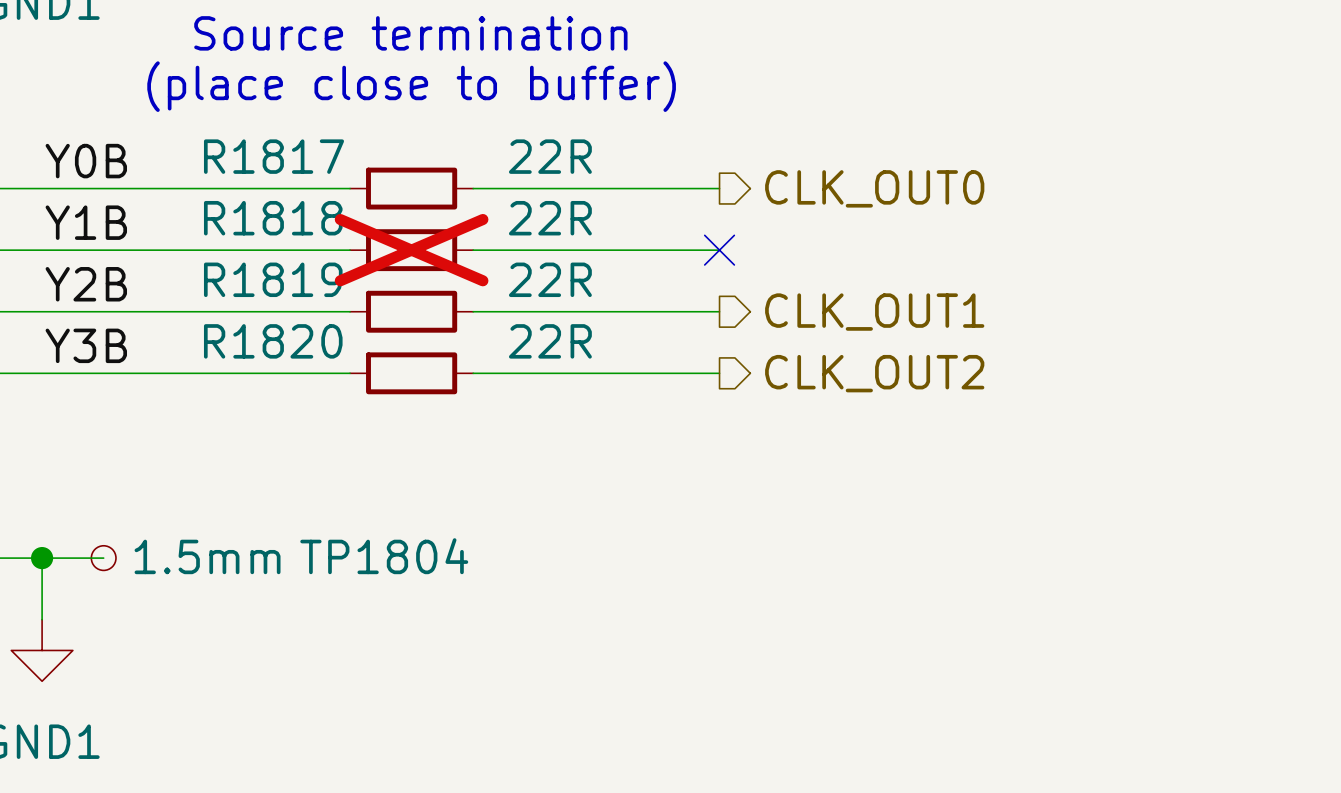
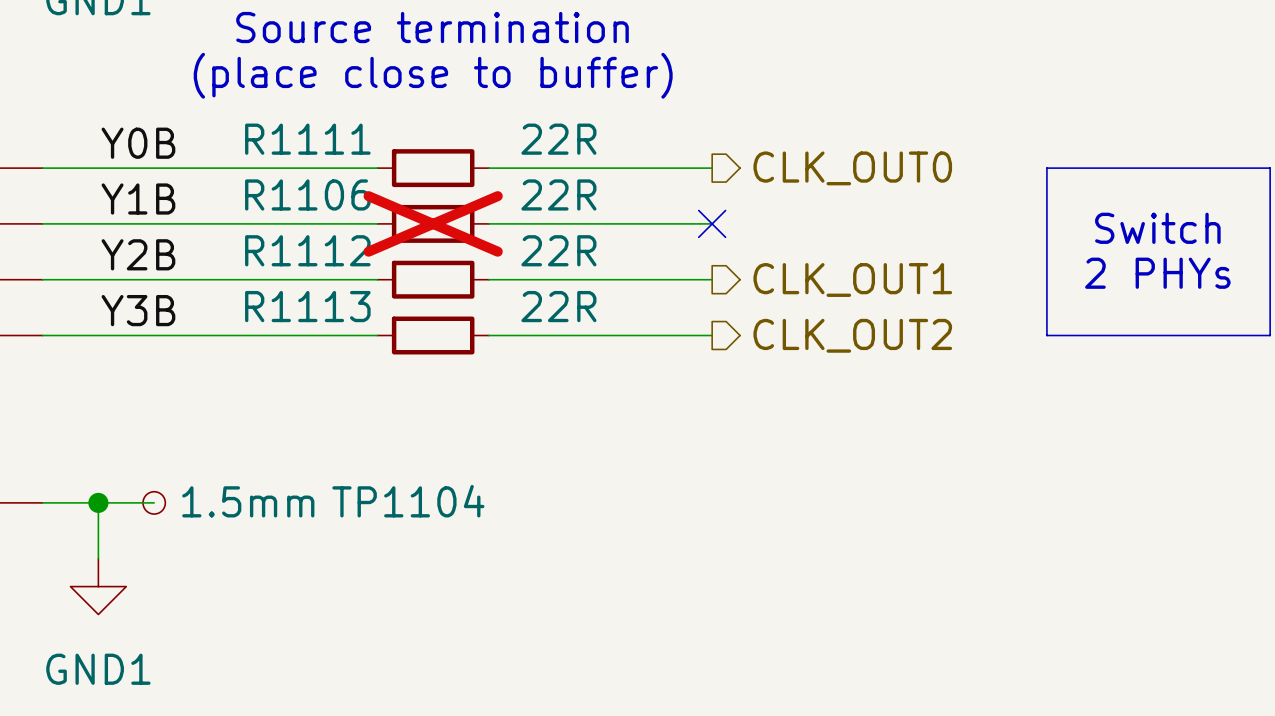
R1817 name: R1817 (274, 156) -> R1111 (307, 139)
line: none -> (1046, 168) (1270, 168) (1270, 335) (1046, 335) (1046, 168)
R1818 name: R1818 (273, 218) -> R1106 (307, 194)
text: none -> Switch (1157, 228)
R1819 name: R1819 (273, 279) -> R1112 (307, 250)
text: none -> 2 PHYs (1157, 273)
R1820 name: R1820 (273, 341) -> R1113 (307, 306)
TP1804 name: TP1804 (384, 556) -> TP1104 (408, 501)

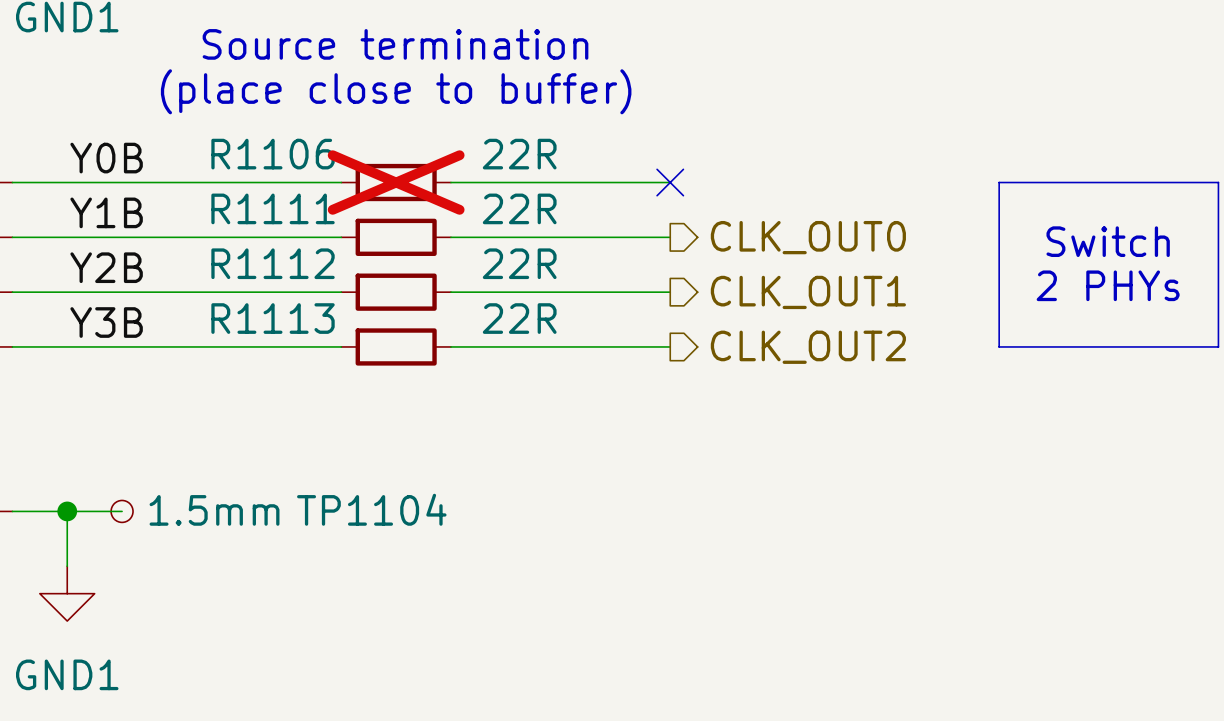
R1111 name: R1111 (307, 139) -> R1106 (273, 154)
R1111 do-not-place cross: none -> (396, 182)
hierarchical label position: CLK_OUT0 (852, 168) -> CLK_OUT0 (808, 237)
R1106 name: R1106 (307, 194) -> R1111 (273, 208)
R1106 do-not-place cross: (433, 223) -> none
no-connect mark position: (712, 223) -> (670, 182)

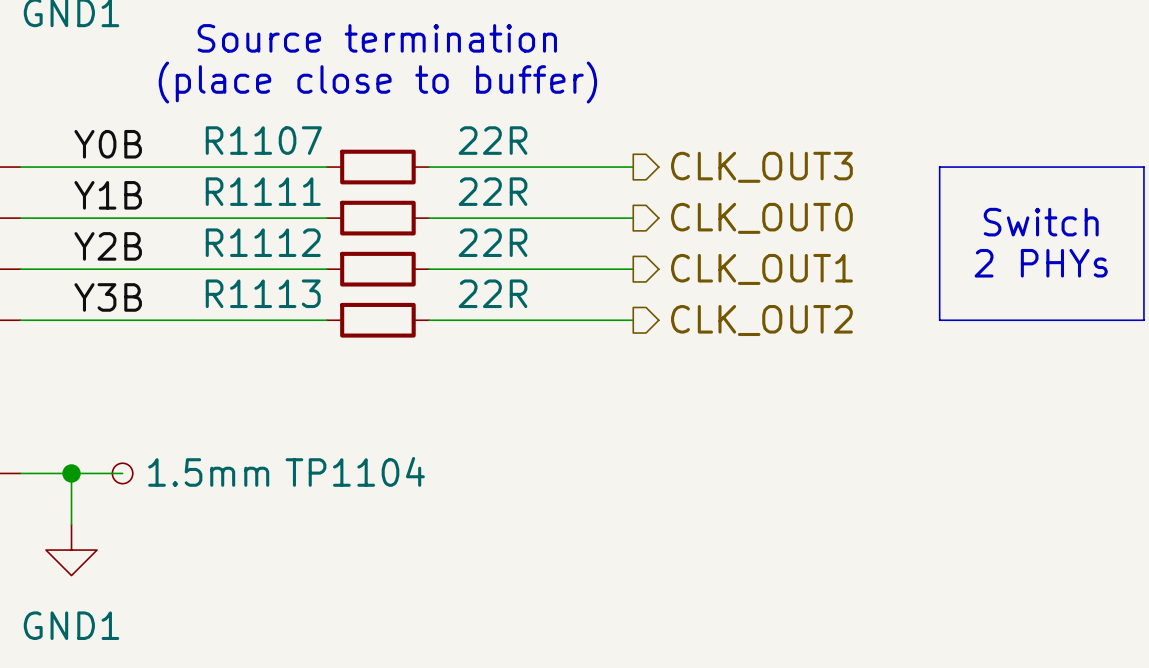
R1106 name: R1106 (273, 154) -> R1107 (263, 140)
R1106 do-not-place cross: (396, 182) -> none
no-connect mark: (670, 182) -> none
hierarchical label: none -> CLK_OUT3 (761, 167)

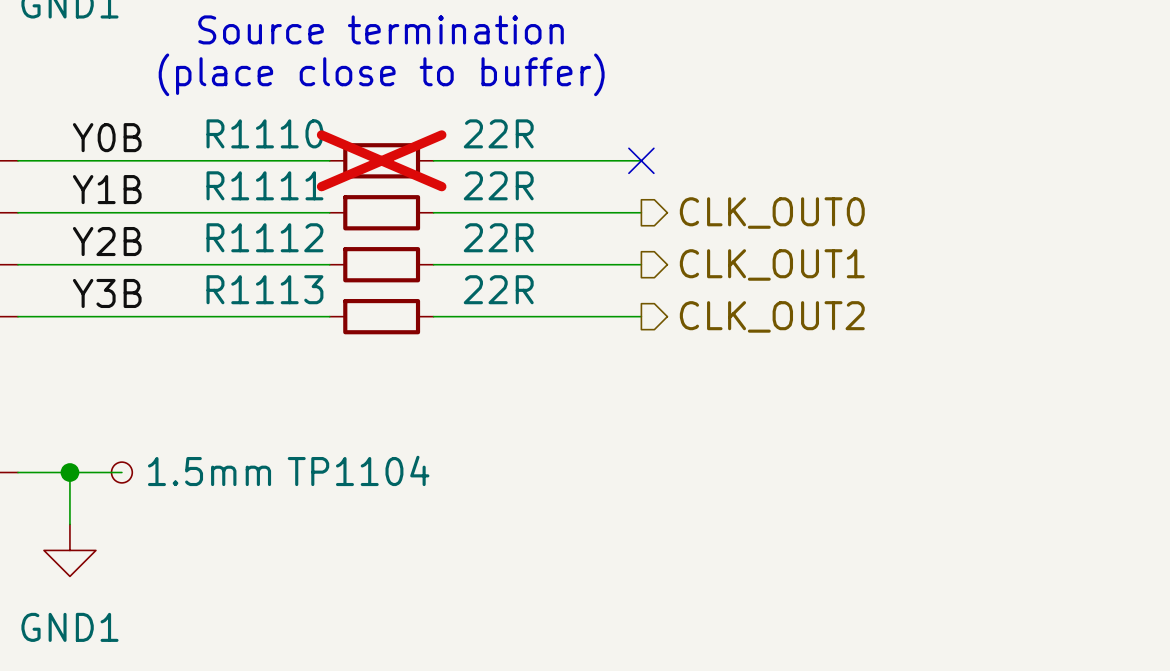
R1107 name: R1107 (263, 140) -> R1110 (264, 133)
R1107 do-not-place cross: none -> (381, 160)
no-connect mark: none -> (641, 160)
hierarchical label: CLK_OUT3 (761, 167) -> none
line: (939, 167) (1143, 167) (1143, 320) (939, 320) (939, 167) -> none
text: Switch (1041, 222) -> none
text: 2 PHYs (1041, 263) -> none

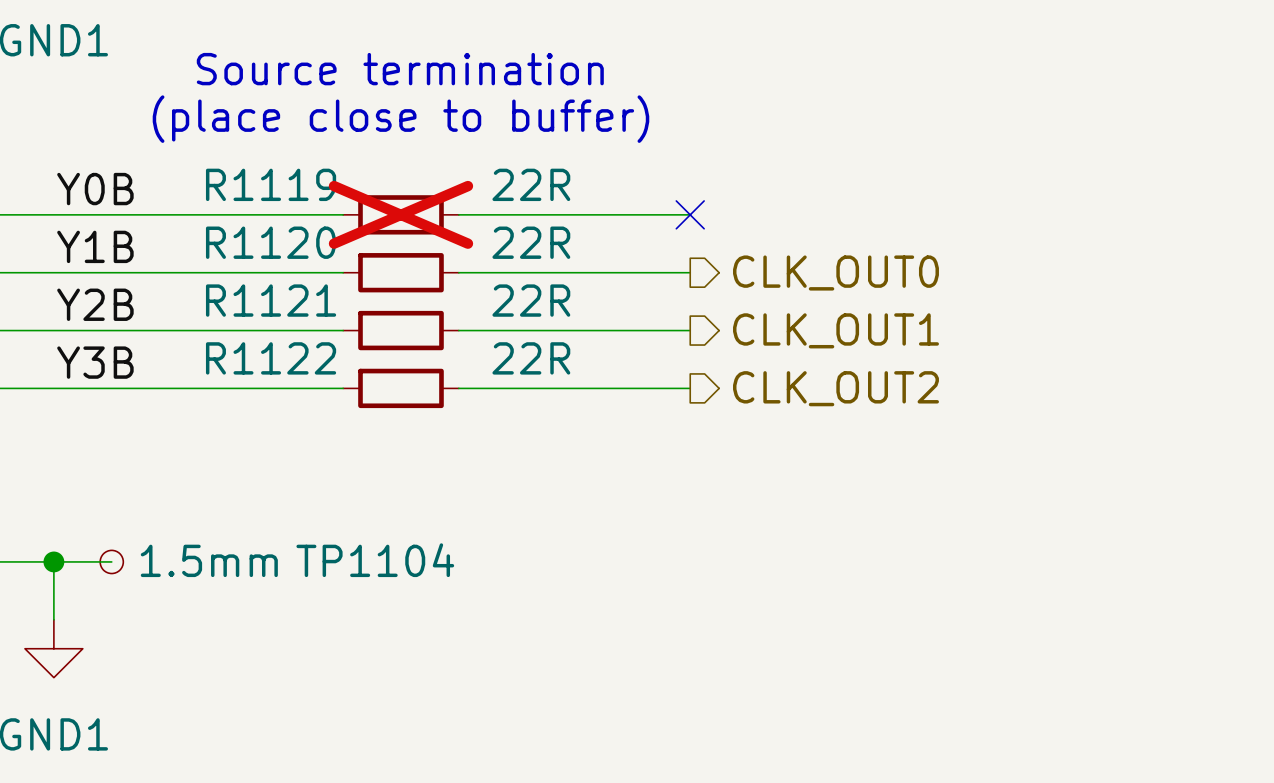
R1110 name: R1110 (264, 133) -> R1119 (271, 184)
R1111 name: R1111 (264, 185) -> R1120 (271, 242)
R1112 name: R1112 (264, 237) -> R1121 (271, 300)
R1113 name: R1113 (264, 289) -> R1122 (271, 358)

